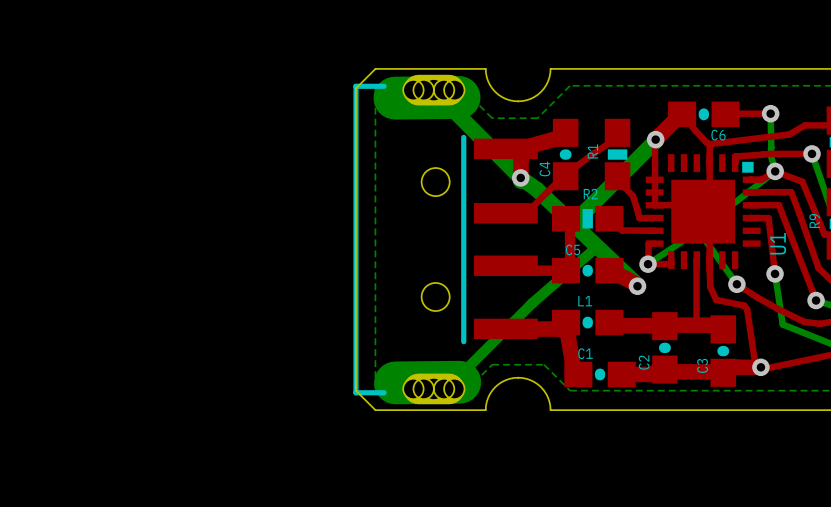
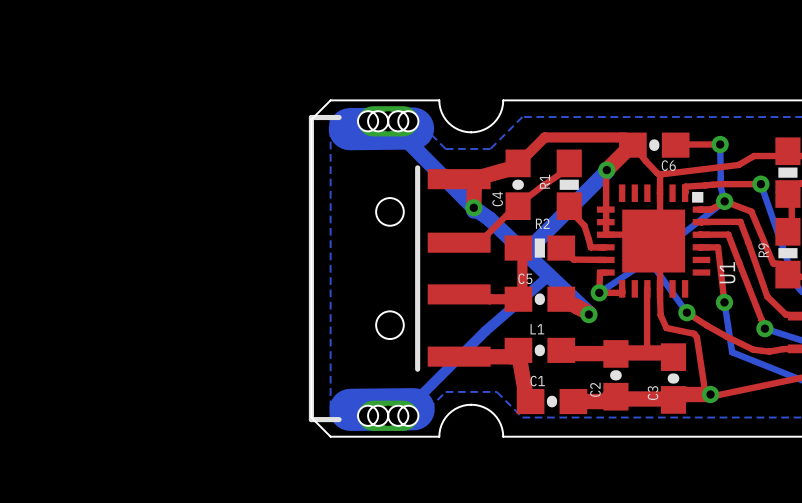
top track: none -> (625, 137) (544, 137) (521, 160)

